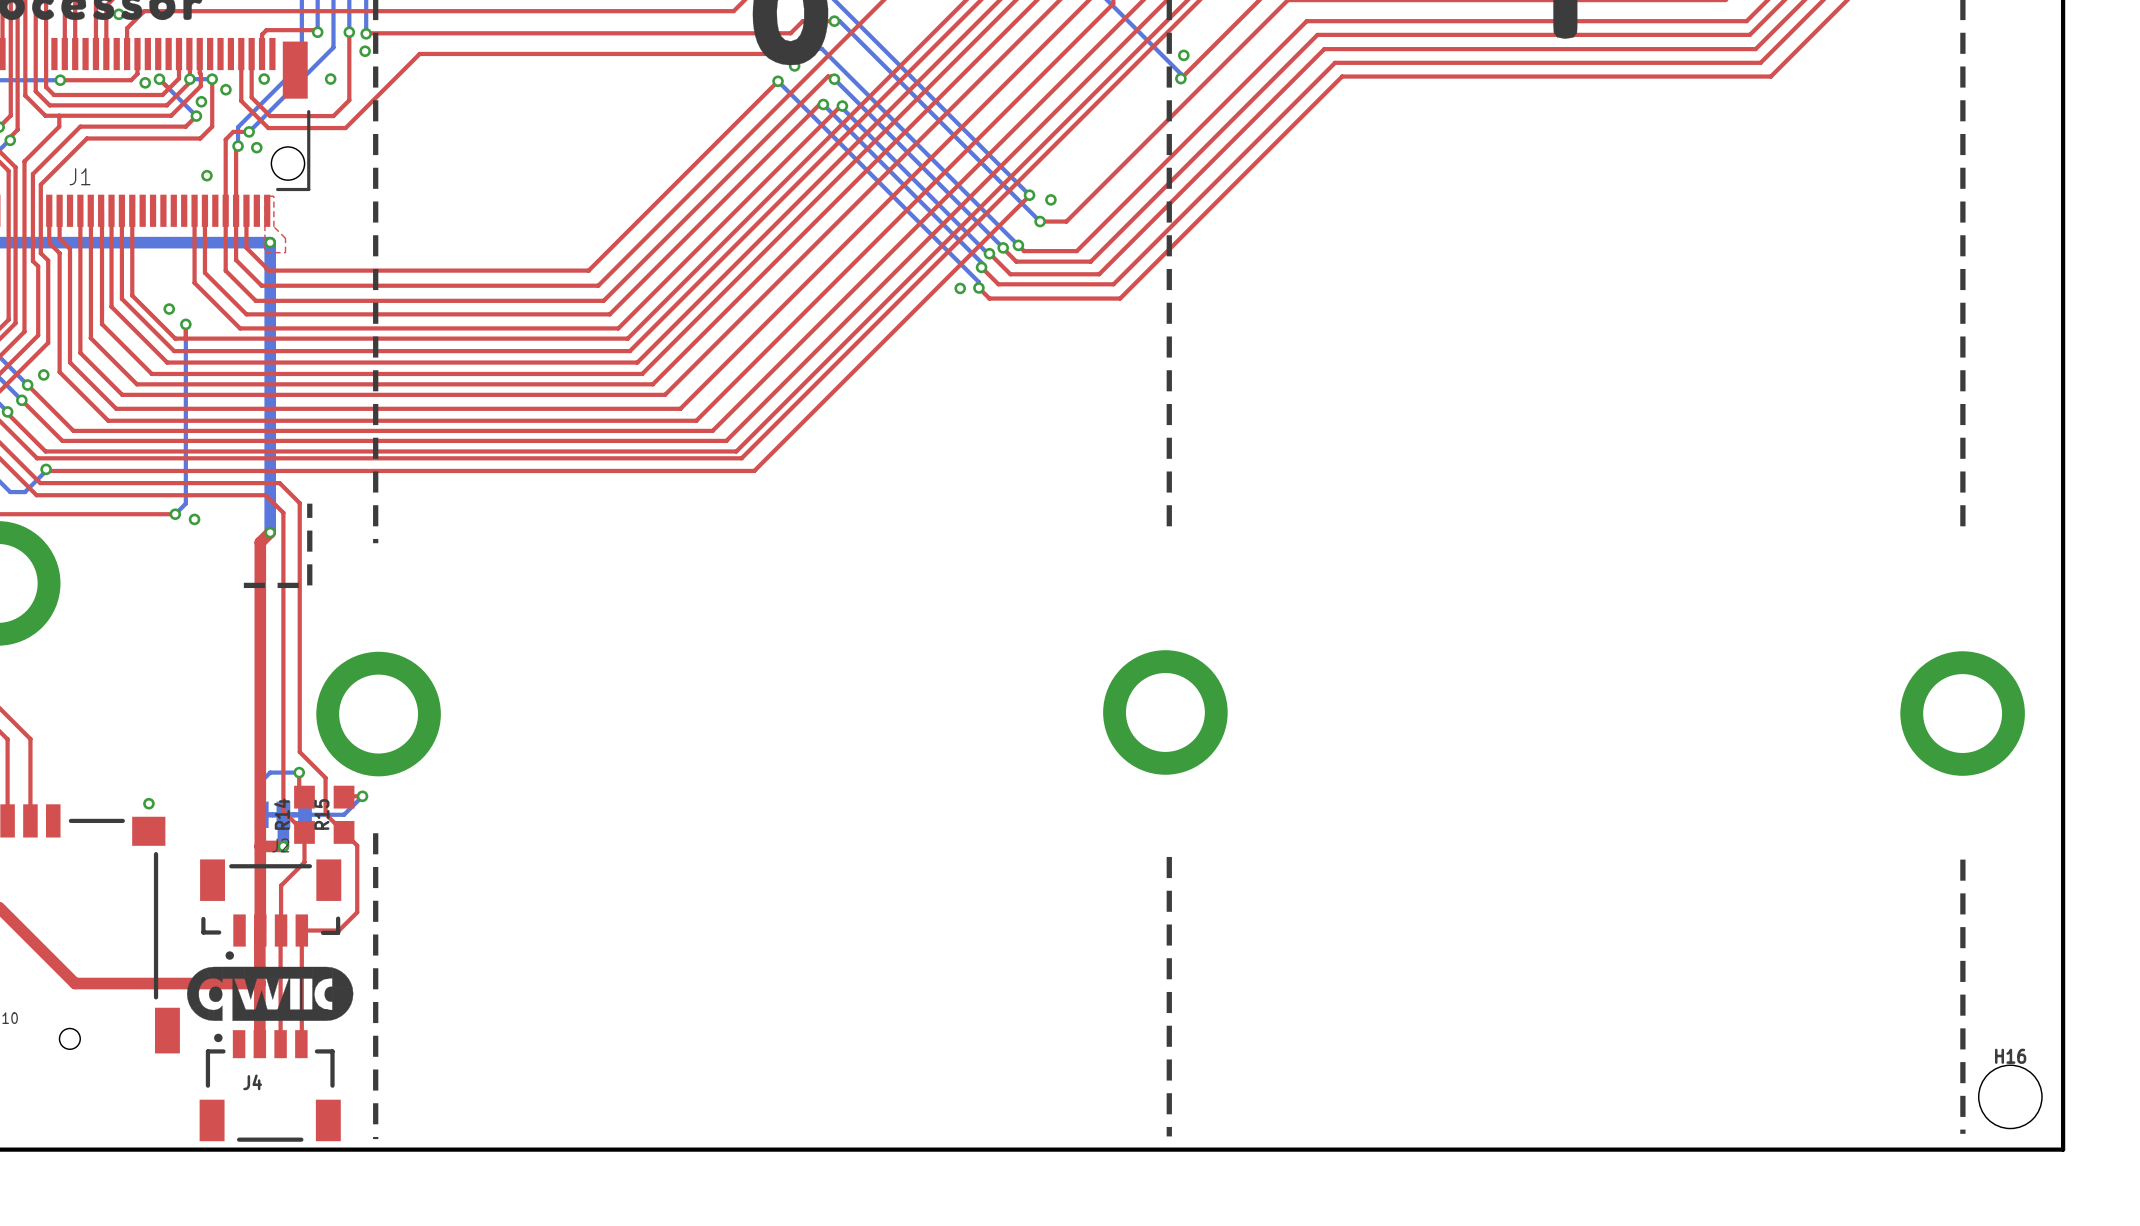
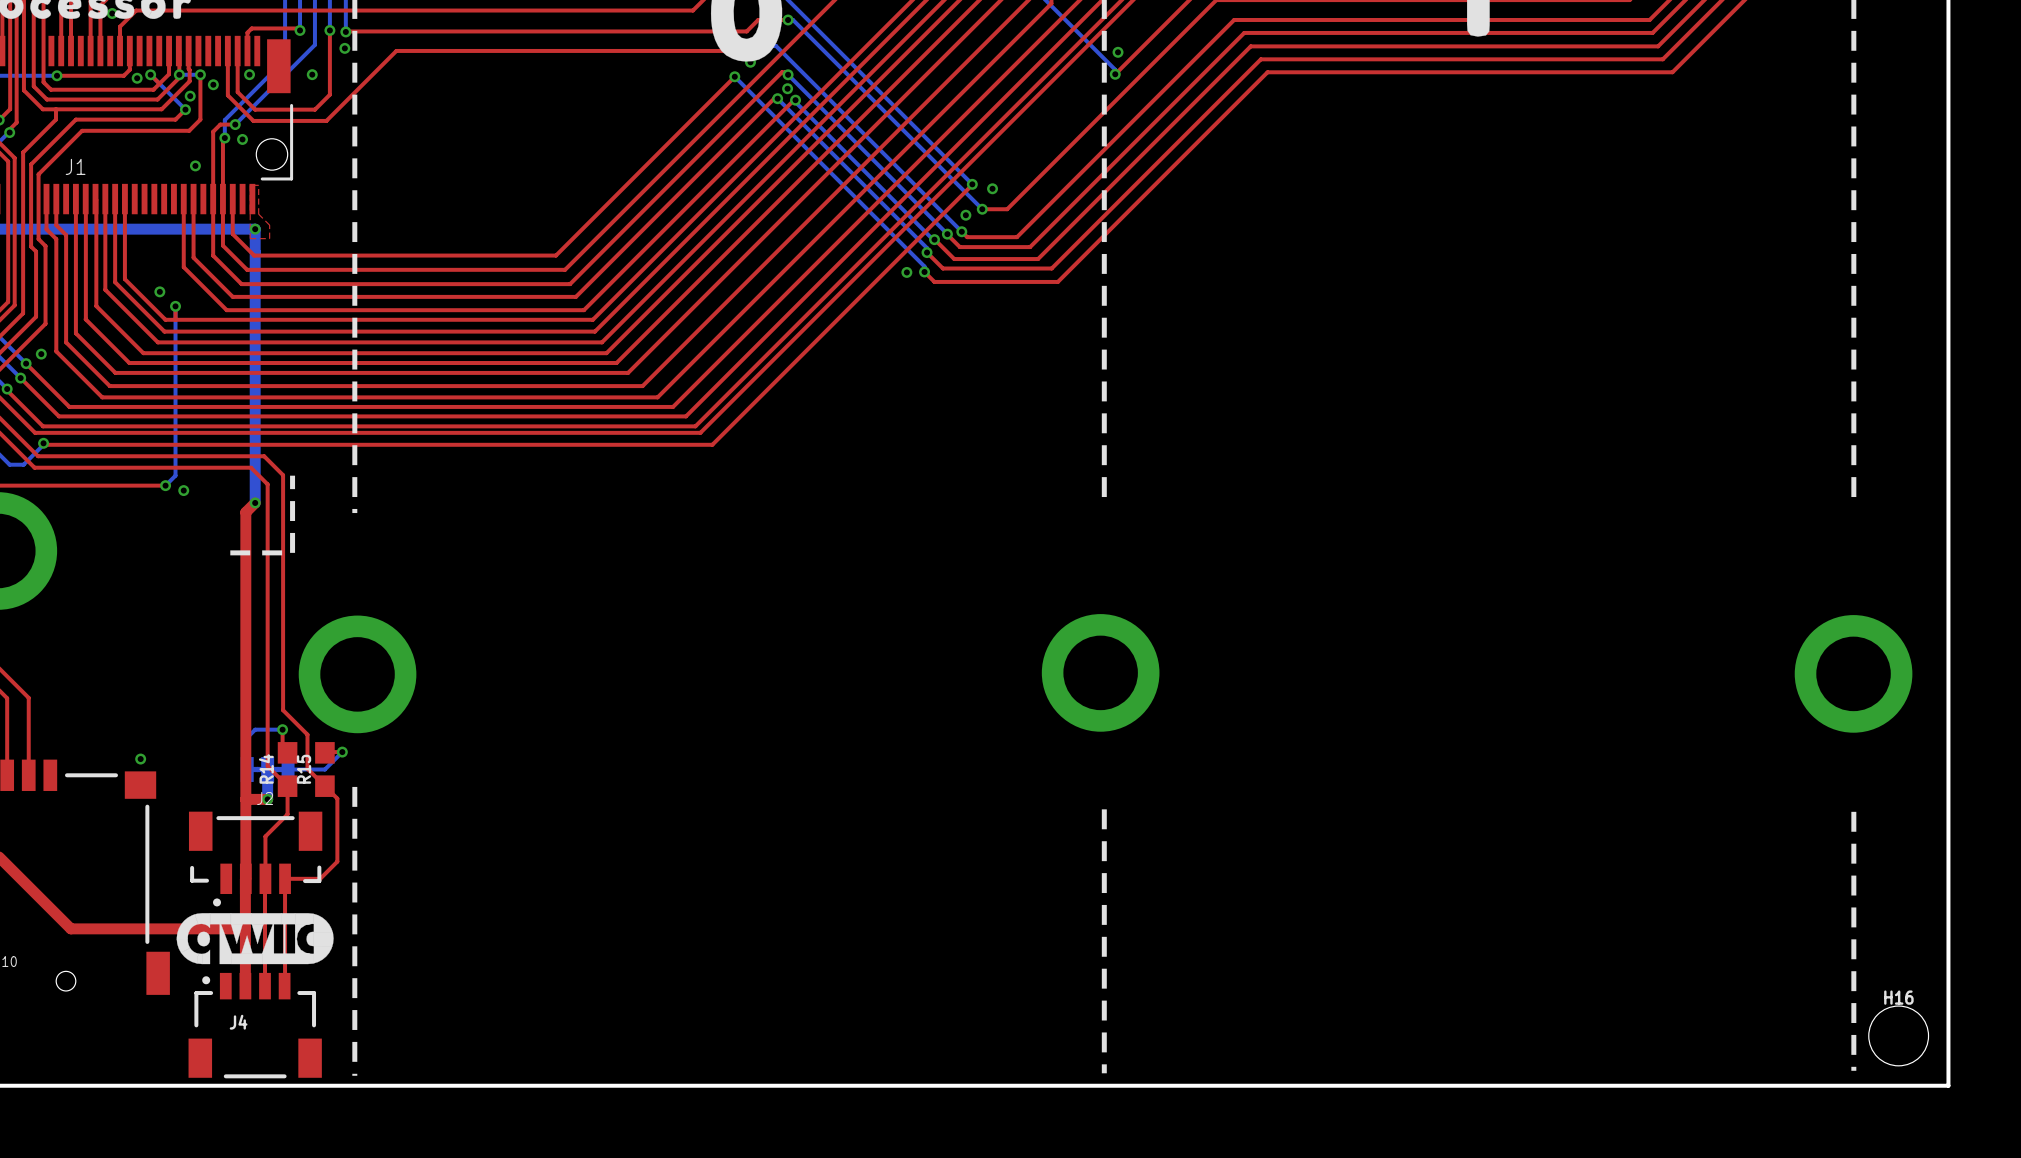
via: none -> (787, 88)
via: none -> (965, 215)

